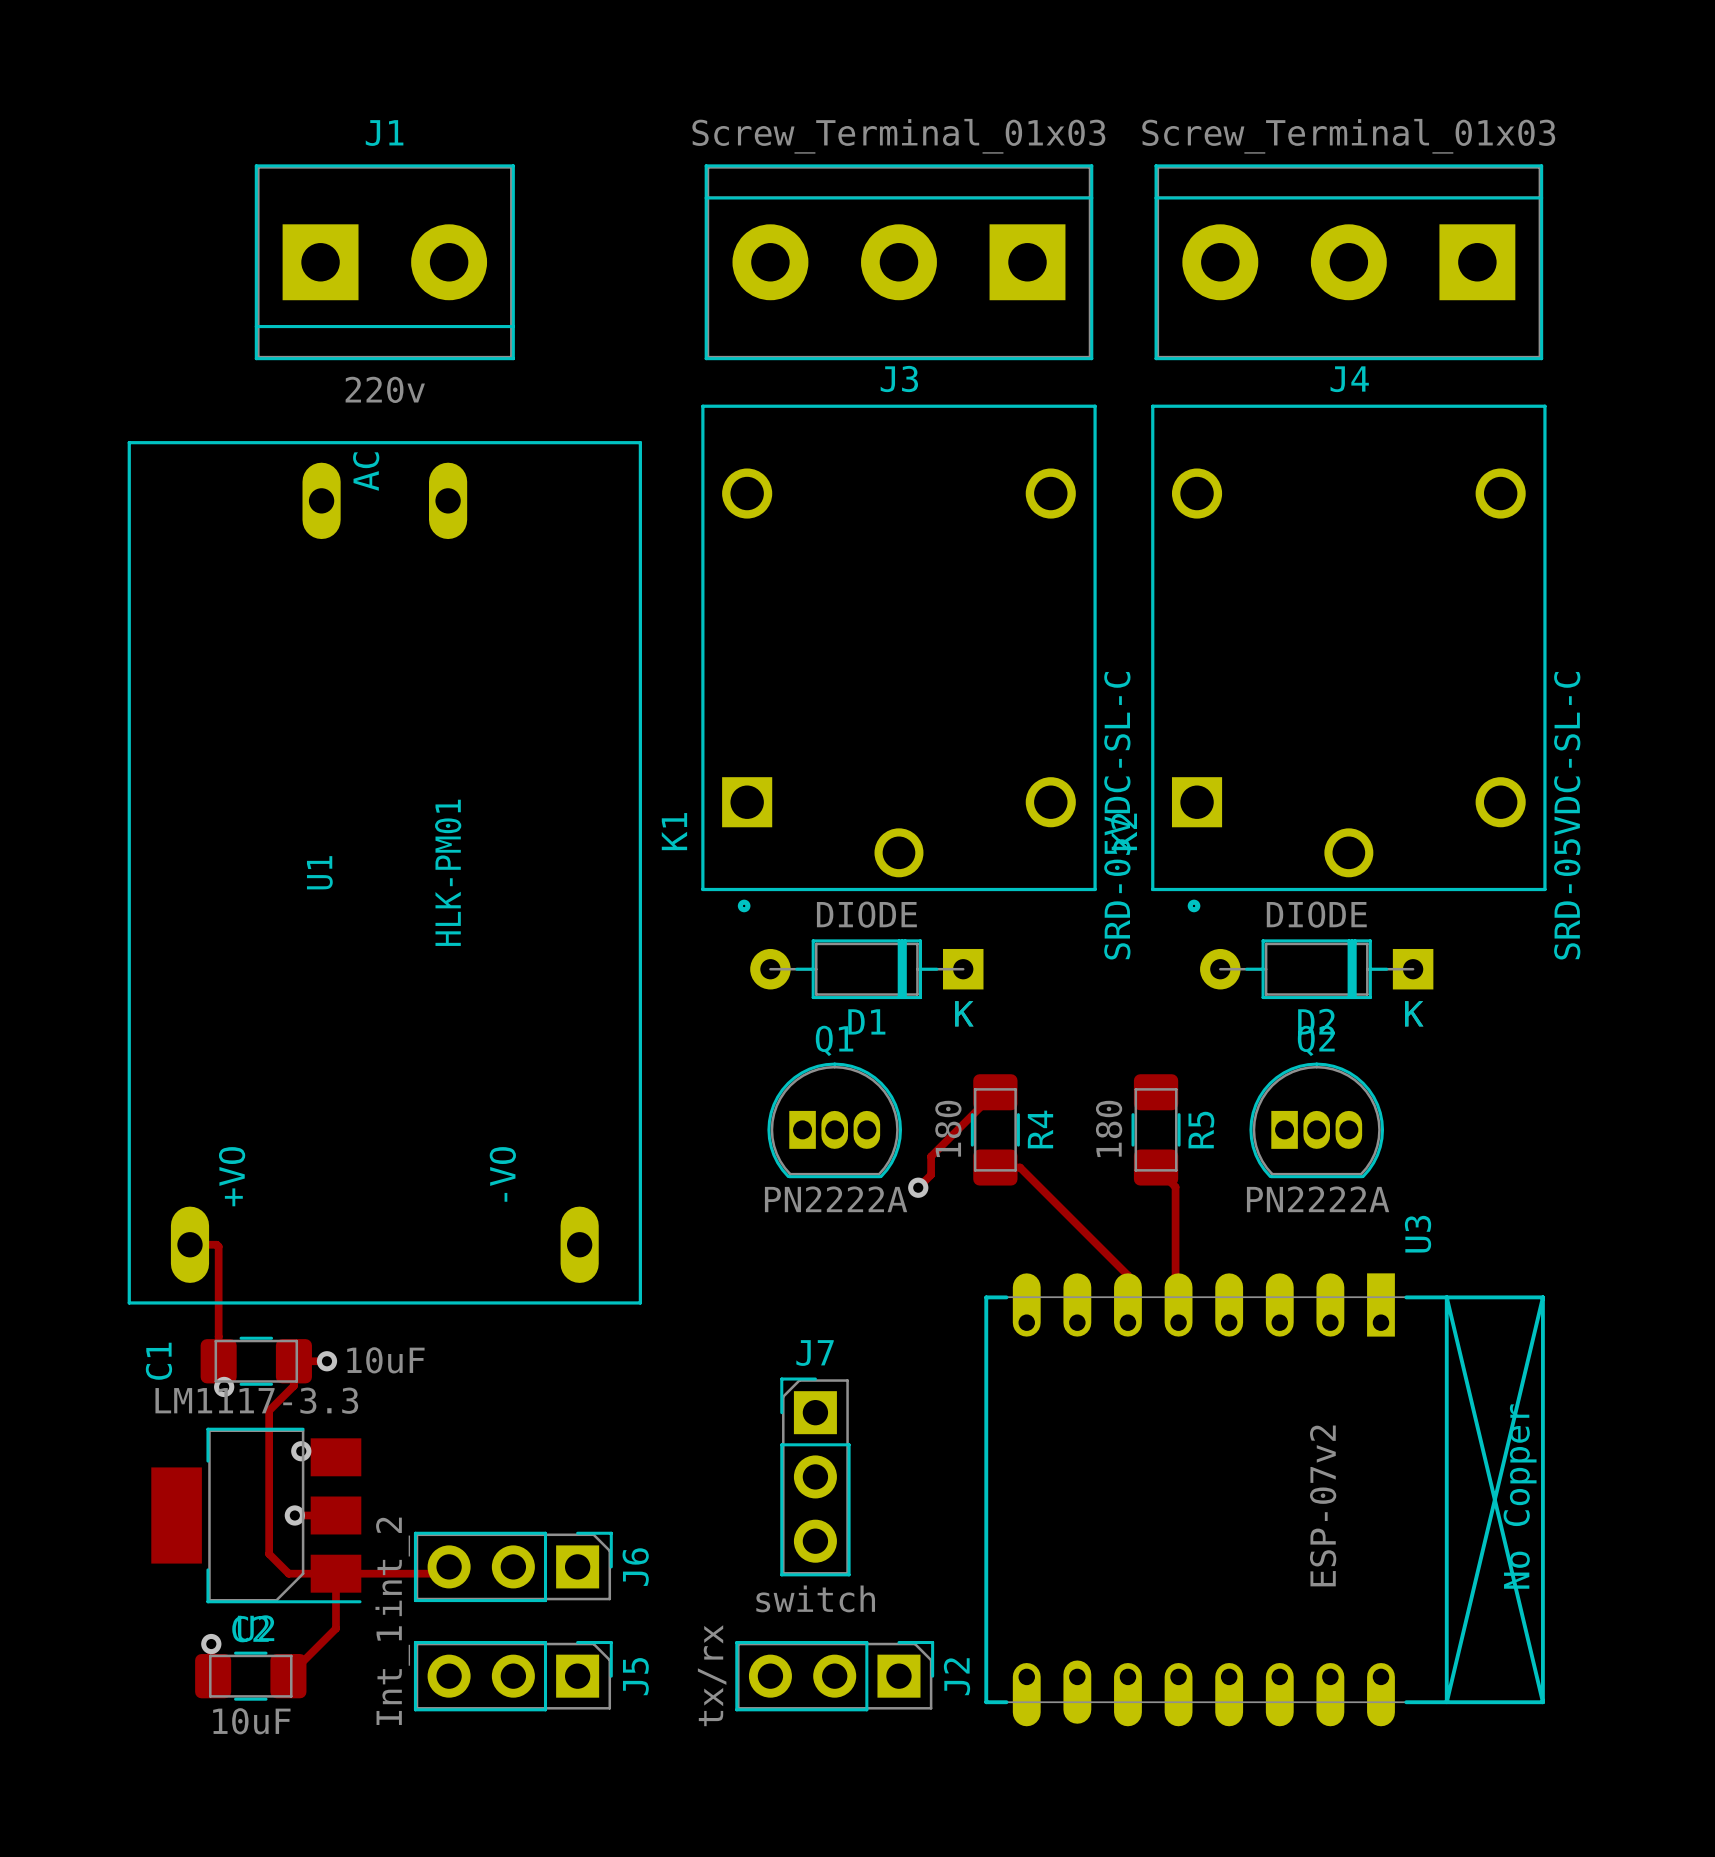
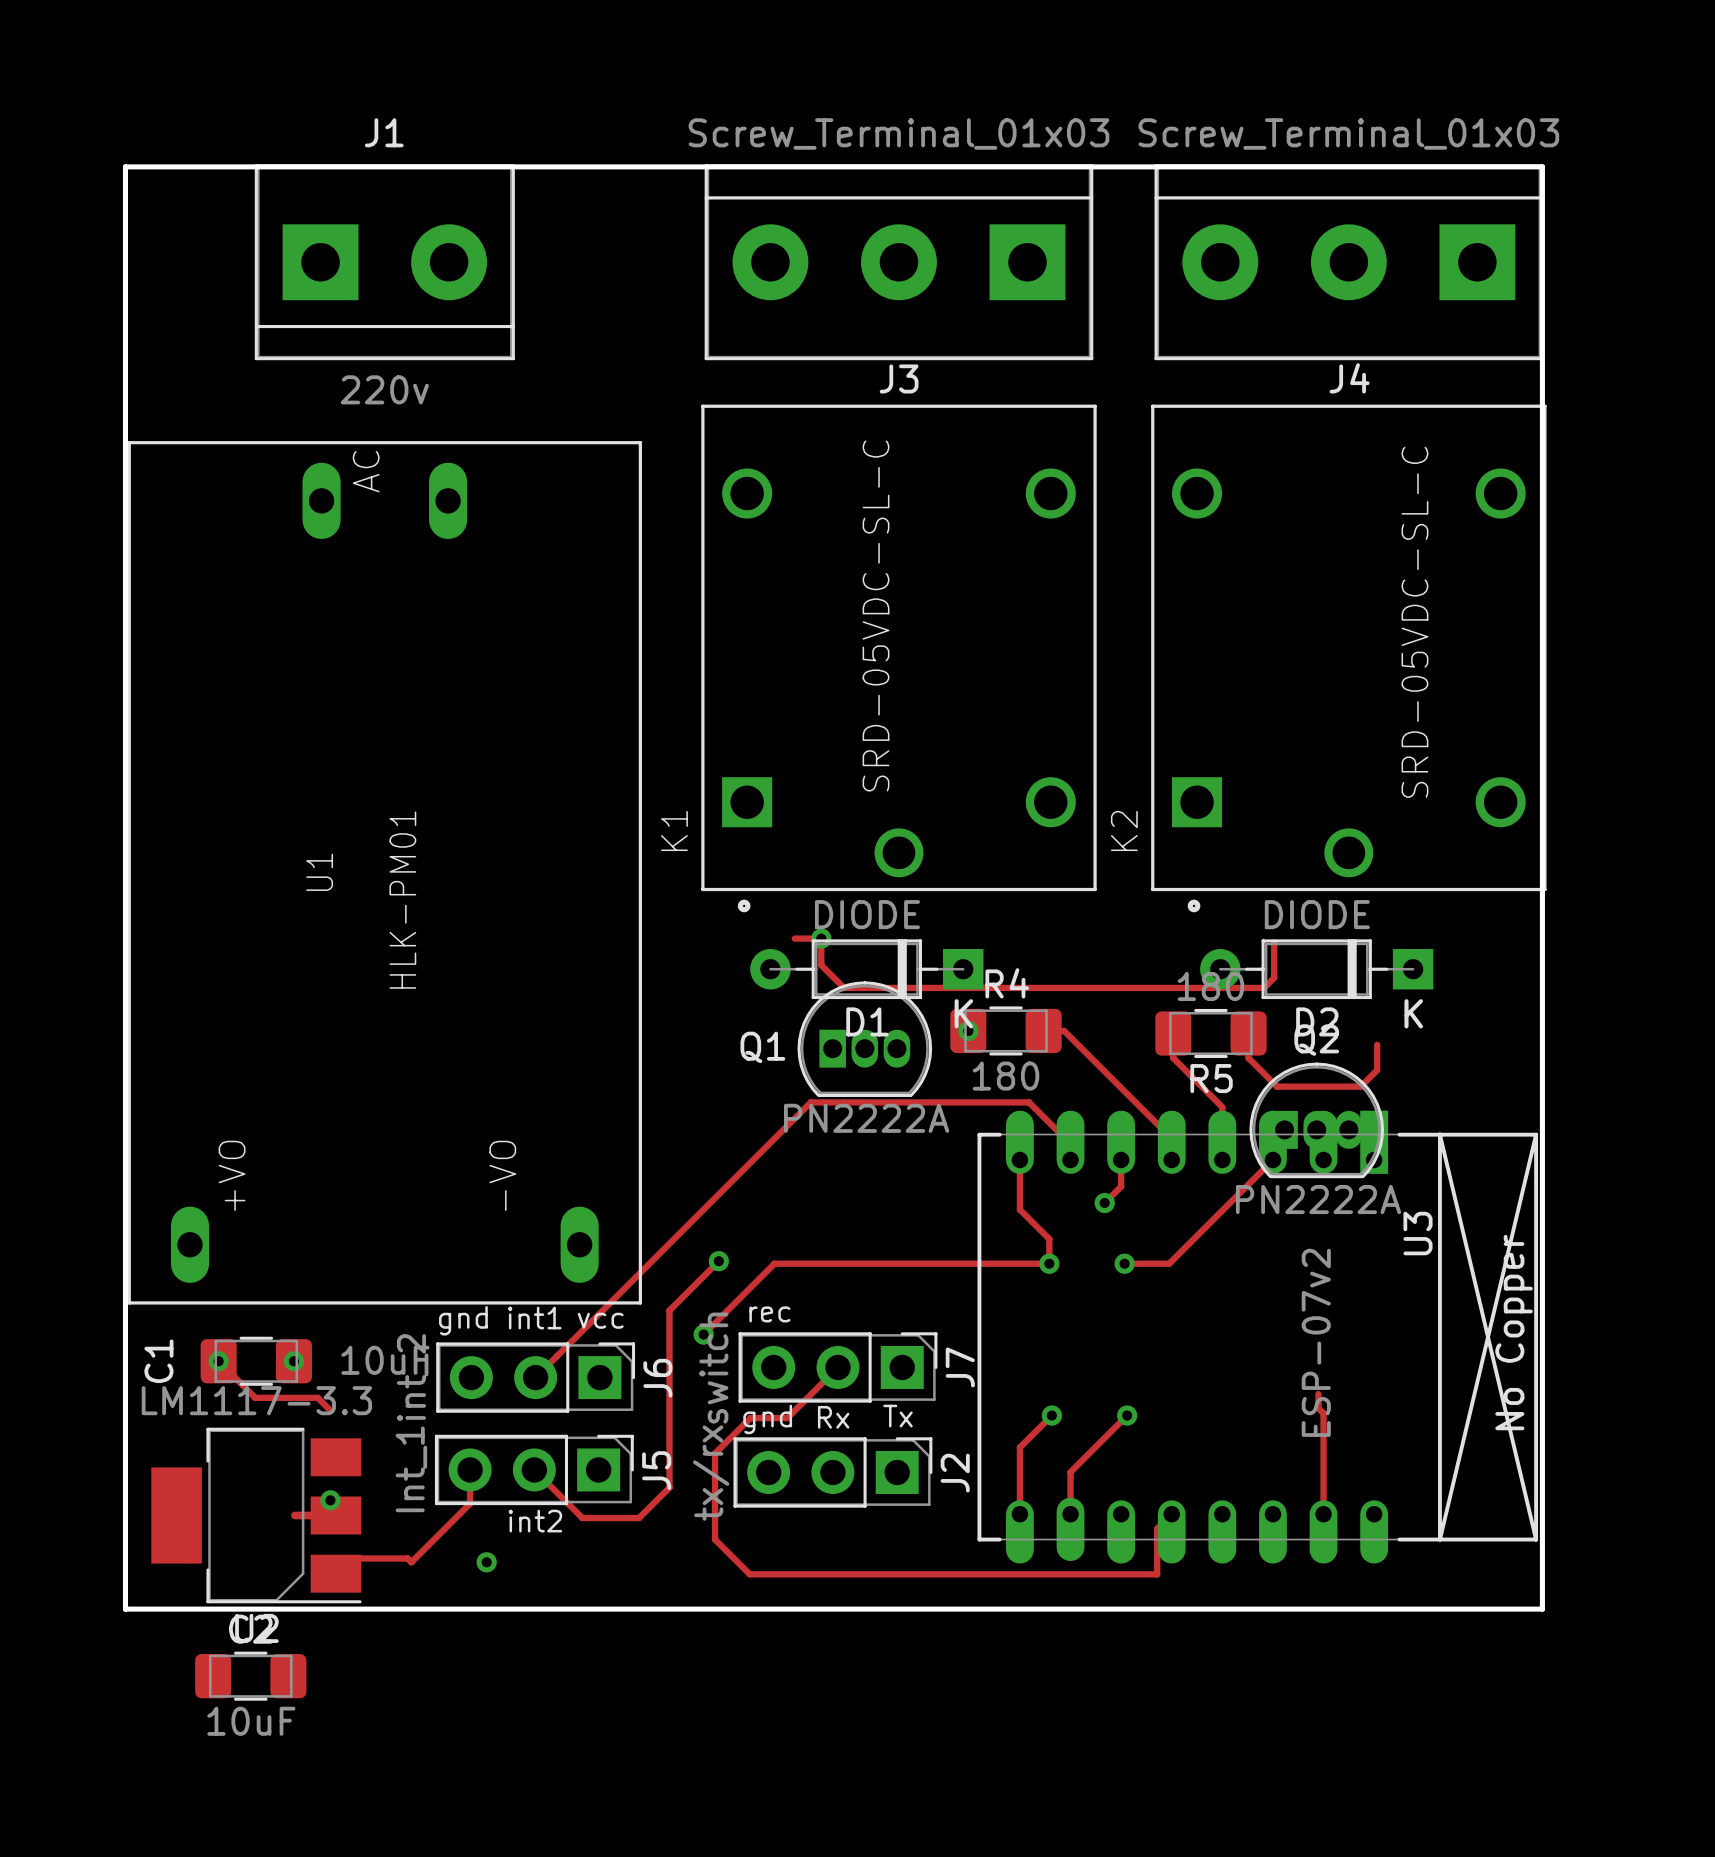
board edge: none -> (125, 166) (125, 1609) (1542, 1609) (1542, 166) (125, 166)
K1 value position: SRD-05VDC-SL-C (1117, 815) -> SRD-05VDC-SL-C (876, 615)
K2 value position: SRD-05VDC-SL-C (1567, 815) -> SRD-05VDC-SL-C (1414, 622)
U1 value position: HLK-PM01 (448, 872) -> HLK-PM01 (402, 900)
track: none -> (794, 938) (821, 938) (821, 965) (844, 987) (1264, 987) (1274, 977) (1274, 942)
via: none -> (821, 938)
via: none -> (968, 1030)
track: none -> (1043, 1030) (1064, 1030) (1171, 1138) (1171, 1159)
track: none -> (1173, 1033) (1173, 1058) (1222, 1107) (1222, 1159)
track: none -> (1248, 1033) (1248, 1058) (1277, 1086) (1360, 1086) (1377, 1070) (1377, 1044)
Q1 name position: Q1 (834, 1040) -> Q1 (762, 1047)
track: (995, 1092) (931, 1156) (931, 1174) (918, 1187) -> none
Q1 position: (834, 1120) -> (864, 1039)
R4 value position: 180 (948, 1128) -> 180 (1006, 1076)
R4 rotation: 0° (995, 1129) -> 90° clockwise (1006, 1030)
R4 position: (995, 1129) -> (1006, 1030)
R4 name position: R4 (1040, 1129) -> R4 (1007, 983)
R5 rotation: 0° (1156, 1129) -> 90° clockwise (1210, 1033)
R5 position: (1156, 1129) -> (1210, 1033)
track: none -> (1019, 1159) (1019, 1209) (1049, 1239) (1049, 1263) (774, 1263) (703, 1334)
track: none -> (1070, 1159) (1070, 1143) (1029, 1102) (810, 1102) (535, 1377)
track: none -> (1121, 1159) (1121, 1186) (1104, 1203)
track: none -> (1272, 1159) (1169, 1263) (1124, 1263)
track: (995, 1167) (1020, 1167) (1127, 1275) (1127, 1322) -> none
track: (1156, 1167) (1175, 1187) (1175, 1319) (1178, 1322) -> none
via: (918, 1187) -> none
via: none -> (1104, 1203)
track: (190, 1244) (216, 1244) (218, 1246) (218, 1381) (224, 1386) -> none
track: none -> (718, 1261) (669, 1310) (669, 1487) (639, 1518) (582, 1518) (534, 1469)
via: none -> (718, 1261)
via: none -> (1049, 1263)
via: none -> (1124, 1263)
text: none -> rec (769, 1314)
text: none -> int1 (534, 1318)
text: none -> gnd (463, 1320)
text: none -> vcc (600, 1320)
via: none -> (703, 1334)
track: none -> (218, 1361) (255, 1397) (317, 1397) (330, 1410)
track: (326, 1361) (293, 1361) (293, 1385) (269, 1410) (269, 1554) (288, 1573) (442, 1573) (449, 1566) -> none
via position: (326, 1361) -> (293, 1361)
track: none -> (837, 1367) (787, 1418) (750, 1418) (715, 1453) (715, 1539) (749, 1574) (1157, 1574) (1157, 1528) (1171, 1514)
via position: (224, 1386) -> (218, 1361)
track: none -> (1318, 1394) (1318, 1408) (1323, 1413) (1323, 1514)
track: none -> (1051, 1415) (1019, 1447) (1019, 1514)
via: none -> (1051, 1415)
track: none -> (1127, 1415) (1070, 1472) (1070, 1514)
via: none -> (1127, 1415)
text: none -> Tx (897, 1416)
text: none -> Rx (833, 1417)
text: none -> gnd (767, 1419)
via: (301, 1451) -> none
track: none -> (470, 1469) (470, 1503) (411, 1562) (407, 1558) (330, 1558)
J7 rotation: 0° (815, 1476) -> 90° clockwise (837, 1367)
U3 position: (1264, 1499) -> (1257, 1337)
via: none -> (330, 1500)
via: (294, 1515) -> none
text: none -> int2 (535, 1521)
via: none -> (486, 1562)
J6 position: (513, 1566) -> (535, 1377)
track: (335, 1573) (335, 1628) (288, 1676) -> none
via: (211, 1644) -> none
J5 position: (513, 1676) -> (534, 1469)
J2 position: (834, 1676) -> (832, 1472)

